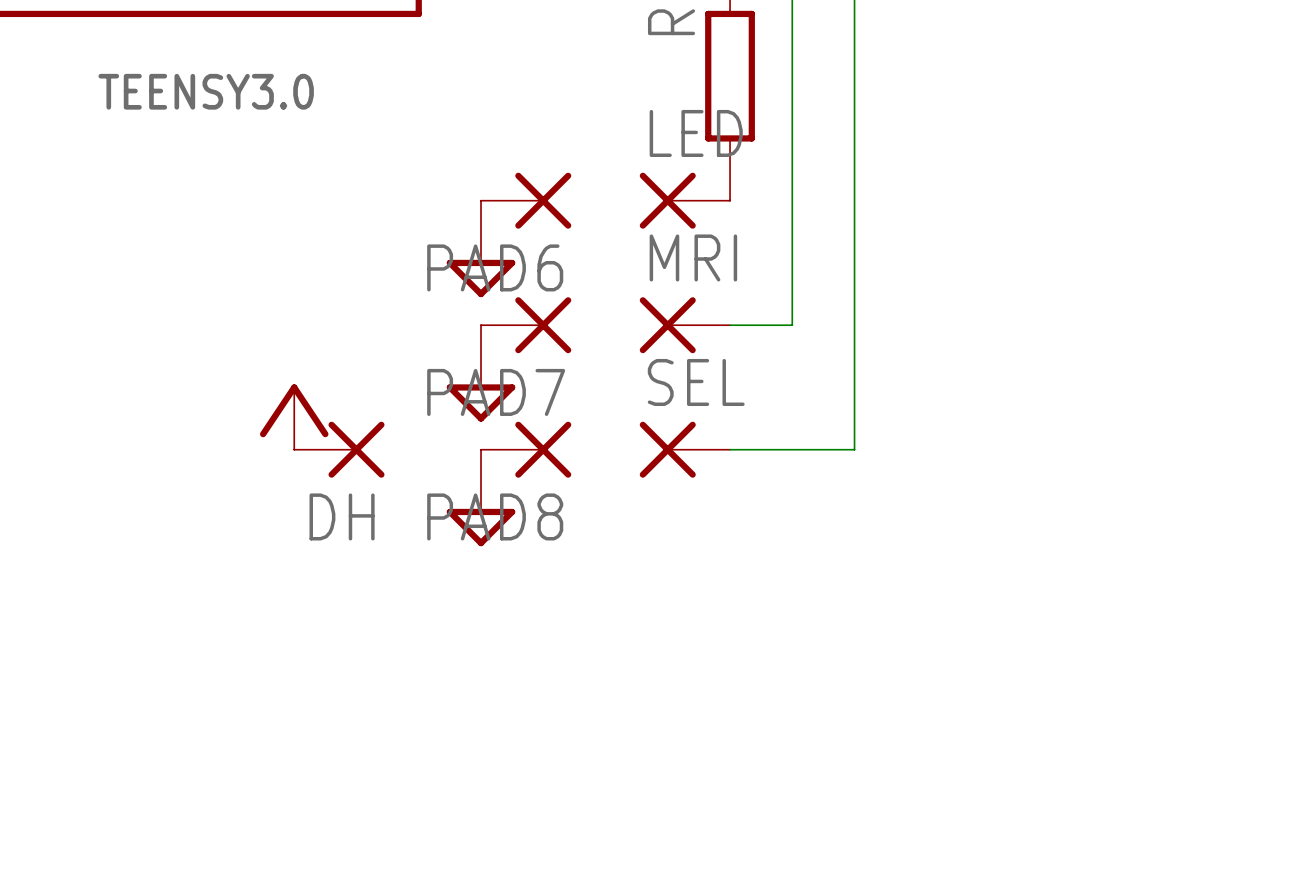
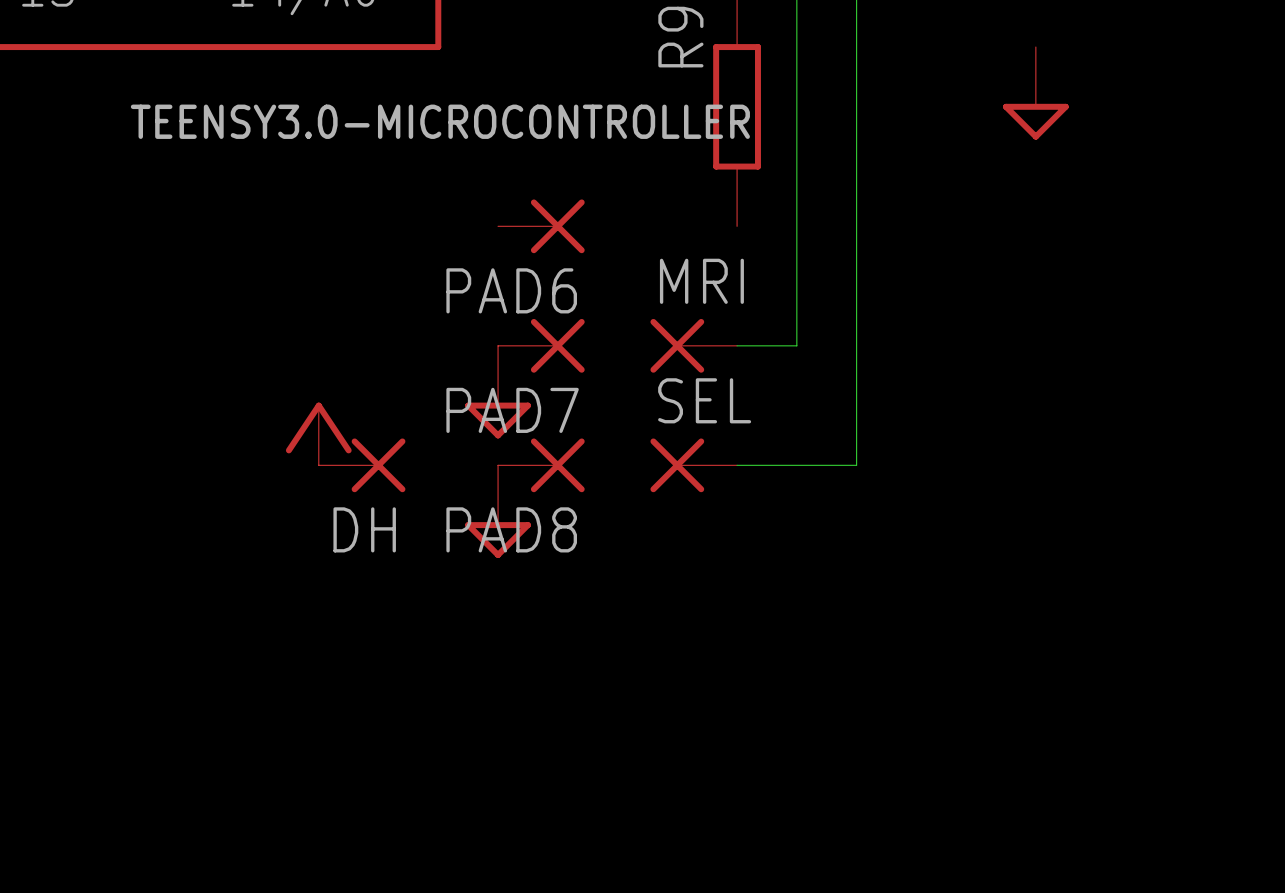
power symbol: none -> (1035, 93)
TEENSY3.0 name: TEENSY3.0 (206, 91) -> TEENSY3.0-MICROCONTROLLER (440, 121)
LED: (684, 200) -> none
power symbol: (481, 248) -> none

